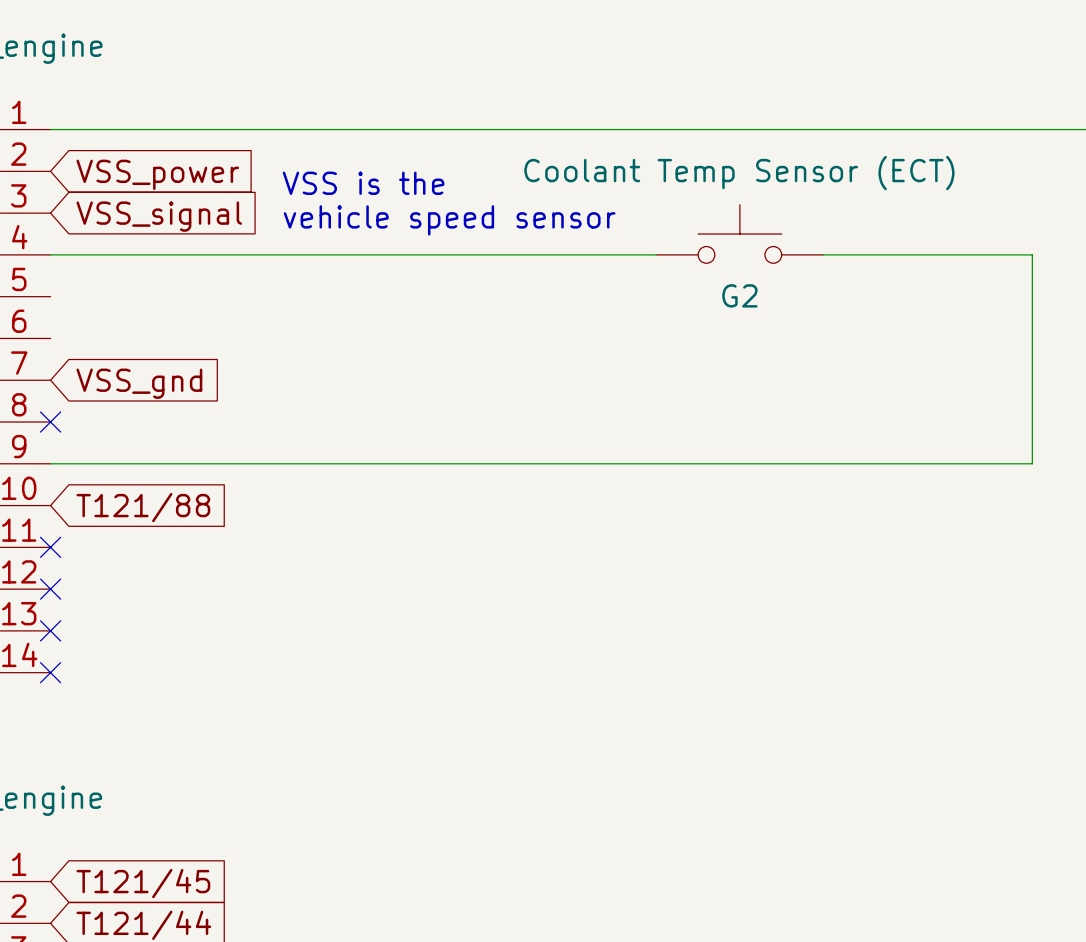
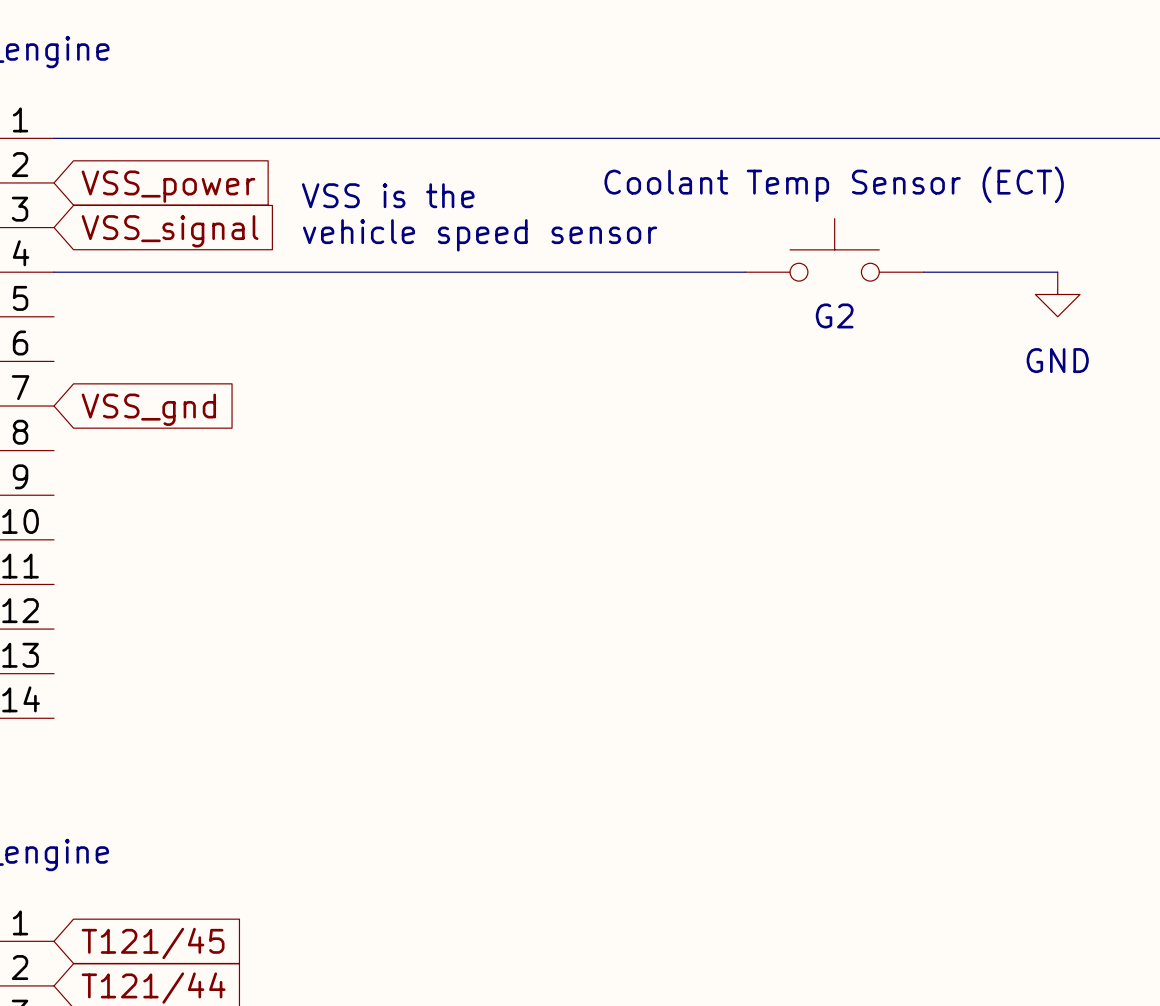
G2 position: (739, 234) -> (834, 249)
wire: (990, 254) (1032, 254) (1032, 463) (50, 463) -> none
power symbol: none -> GND (1057, 294)
no-connect mark: (50, 422) -> none
global label: T121/88 (143, 507) -> none
no-connect mark: (50, 547) -> none
no-connect mark: (50, 589) -> none
no-connect mark: (50, 630) -> none
no-connect mark: (50, 672) -> none

